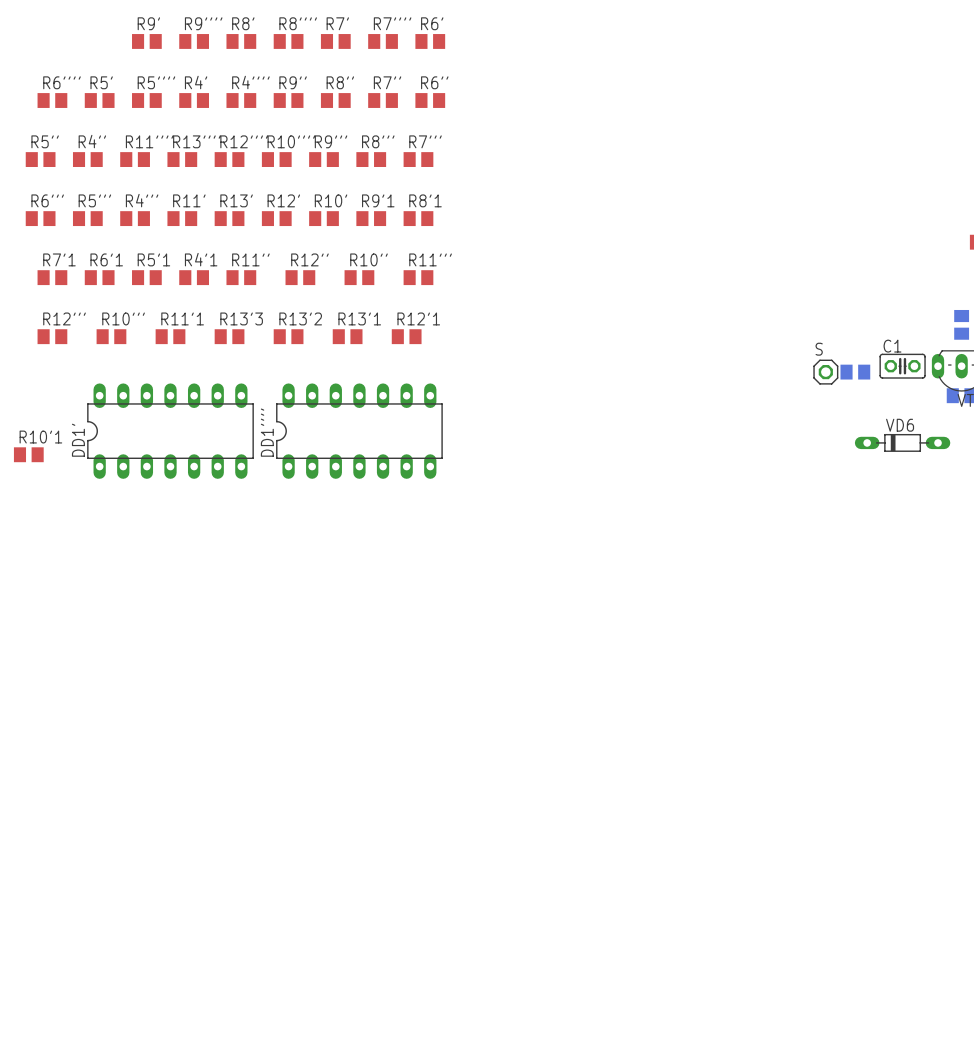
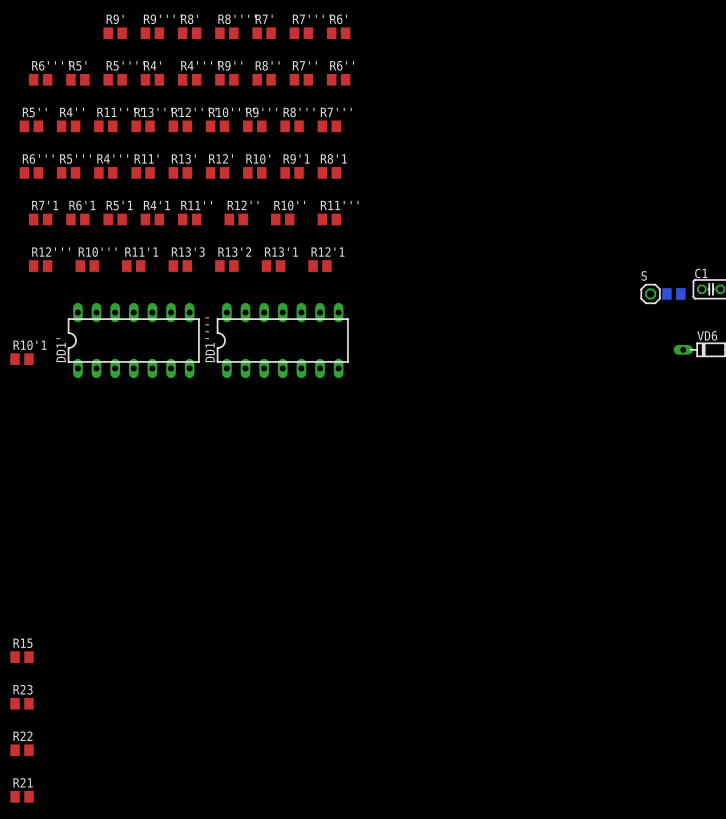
R15: none -> (22, 657)
R23: none -> (22, 703)
R22: none -> (22, 750)
R21: none -> (22, 796)

